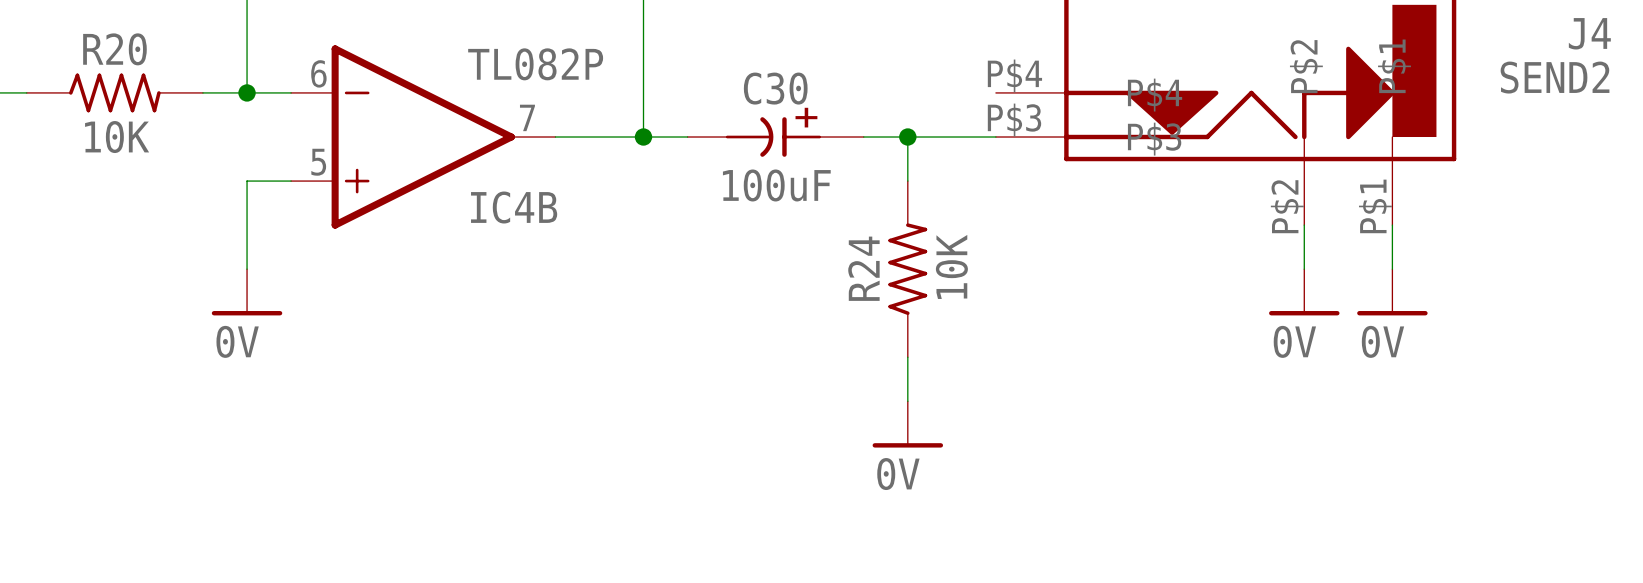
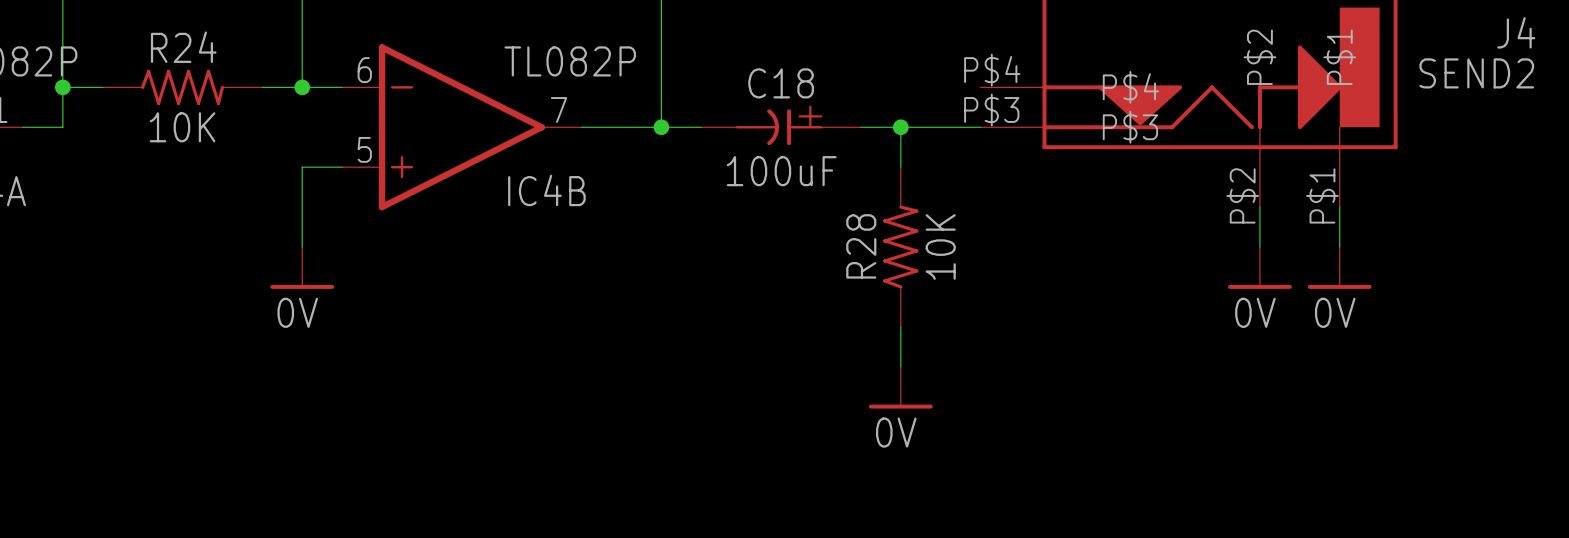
R20 name: R20 (114, 49) -> R24 (183, 47)
C30 name: C30 (775, 88) -> C18 (781, 83)
R24 name: R24 (863, 268) -> R28 (861, 246)

